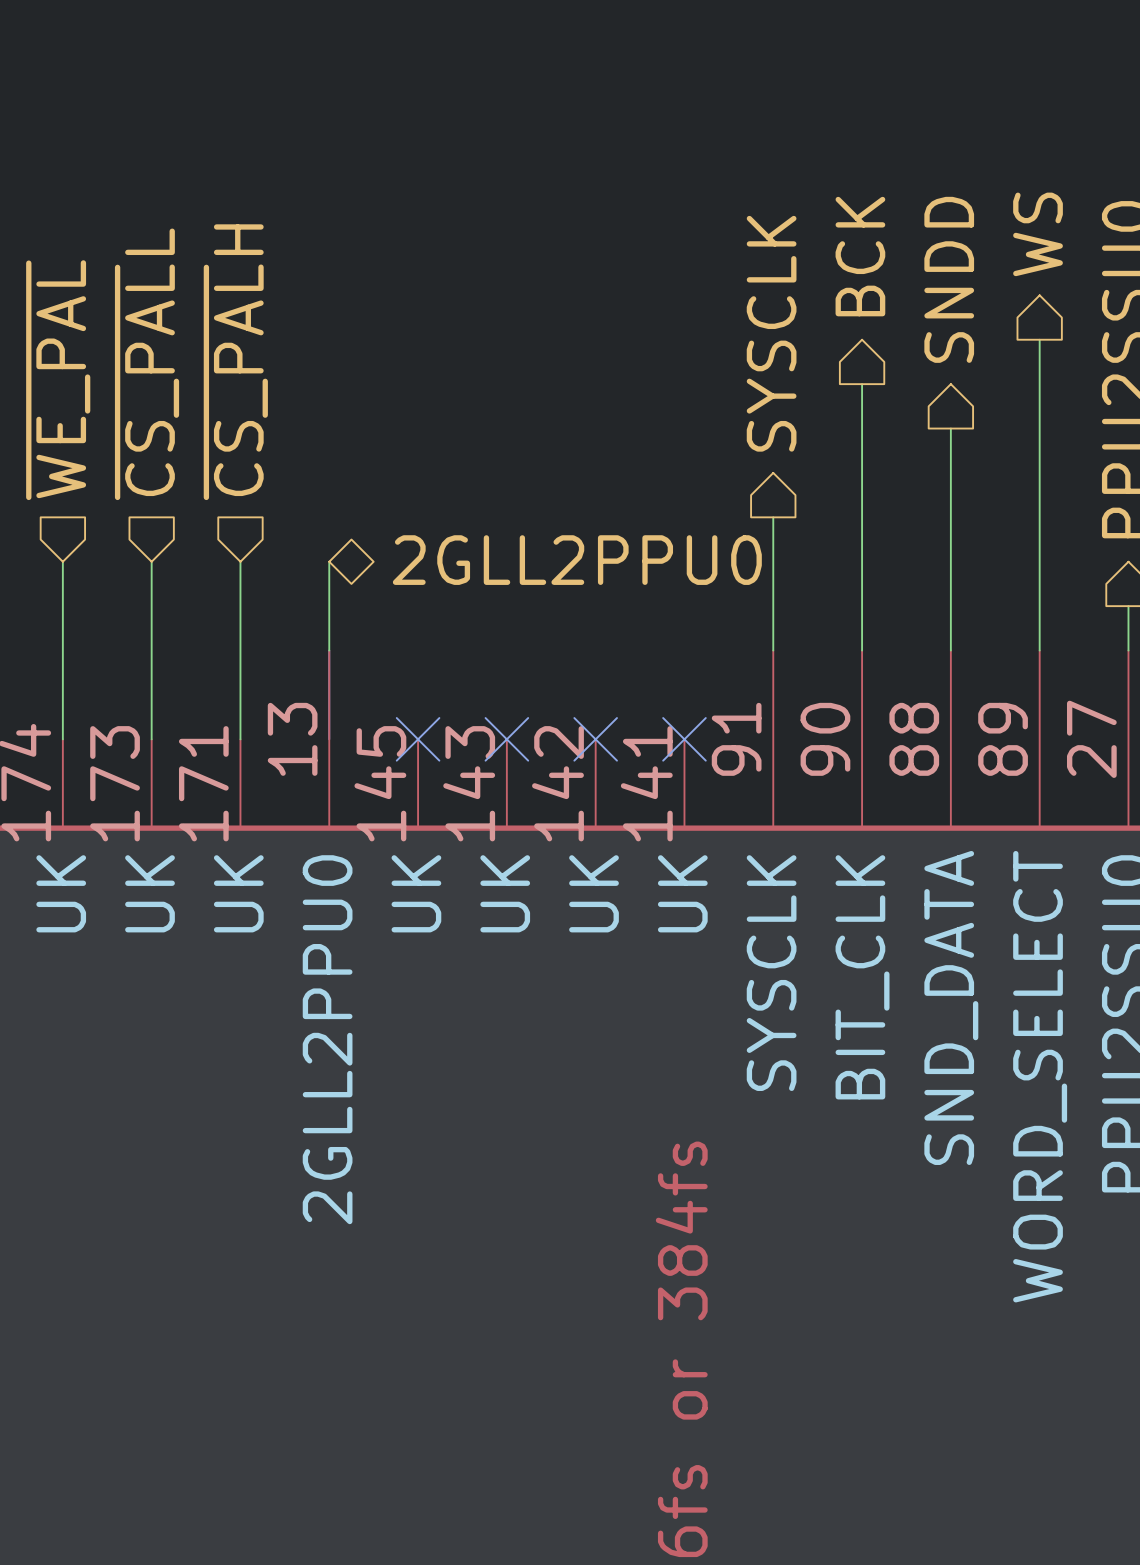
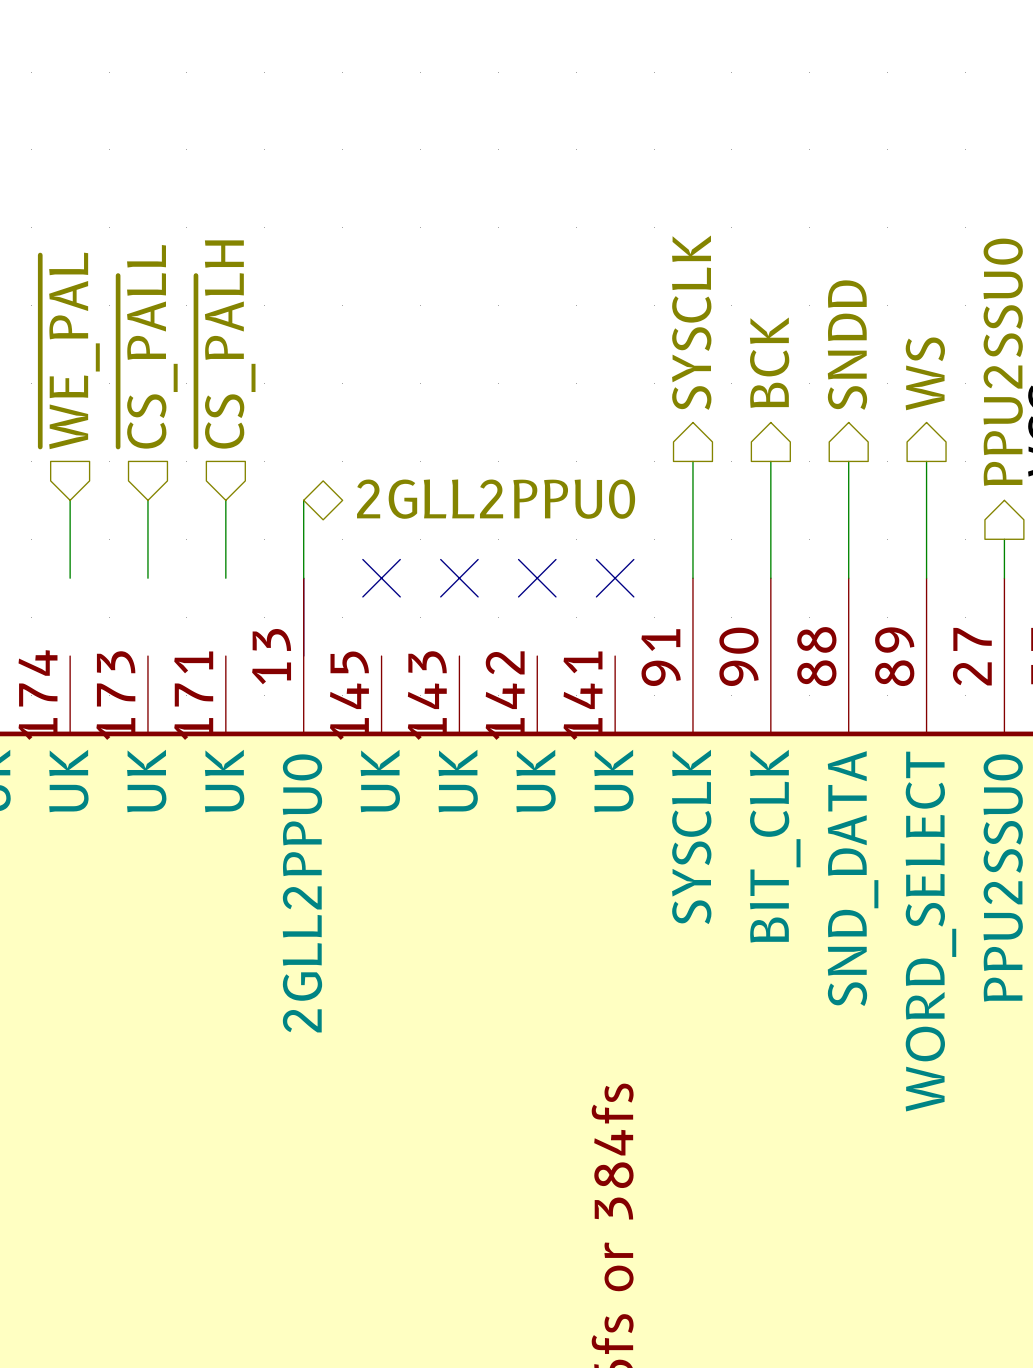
hierarchical label position: WS (1038, 234) -> WS (925, 373)
hierarchical label position: BCK (860, 256) -> BCK (769, 362)
hierarchical label position: SNDD (949, 279) -> SNDD (847, 345)
wire: (1039, 339) (1039, 517) -> none
wire: (862, 384) (862, 517) -> none
wire: (950, 428) (950, 517) -> none
wire: (62, 650) (62, 739) -> none
wire: (151, 650) (151, 739) -> none
wire: (240, 650) (240, 739) -> none
no-connect mark: none -> (381, 578)
no-connect mark: none -> (459, 578)
no-connect mark: none -> (537, 578)
no-connect mark: none -> (615, 578)
no-connect mark: (418, 739) -> none
no-connect mark: (506, 739) -> none
no-connect mark: (595, 739) -> none
no-connect mark: (684, 739) -> none

